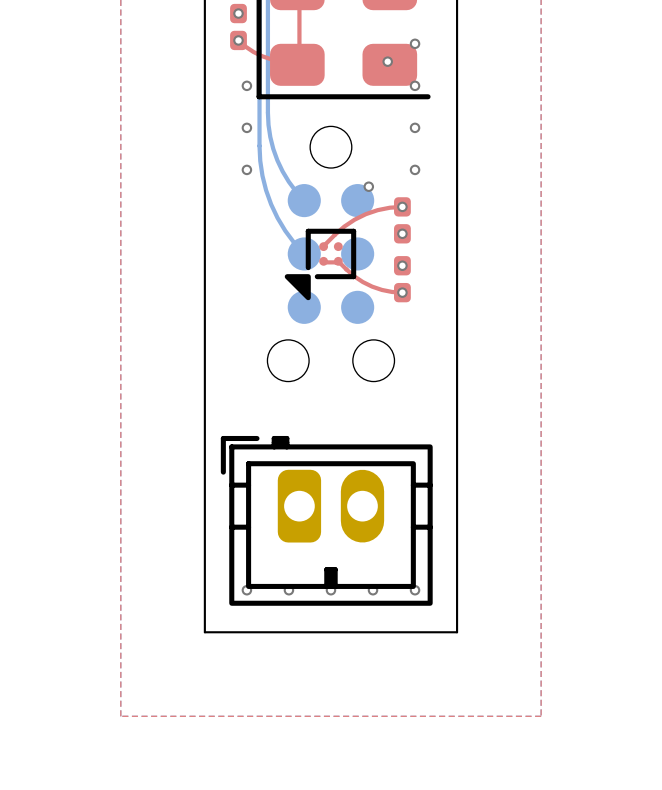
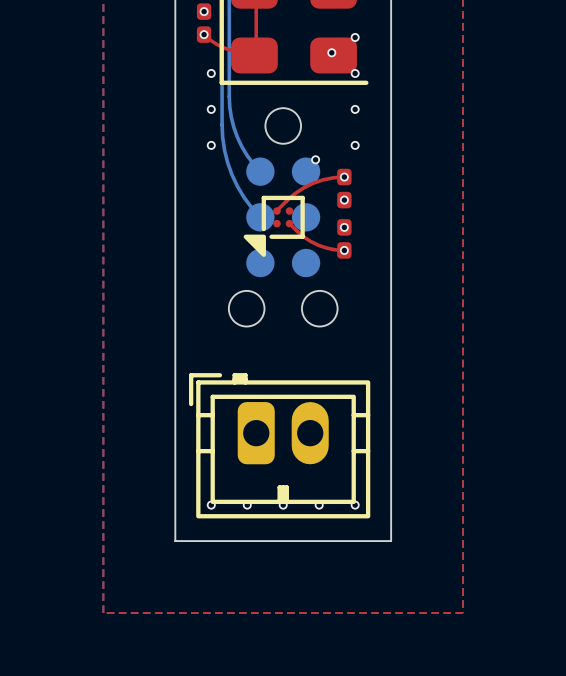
top track: (338, 261) (326, 262) -> none

